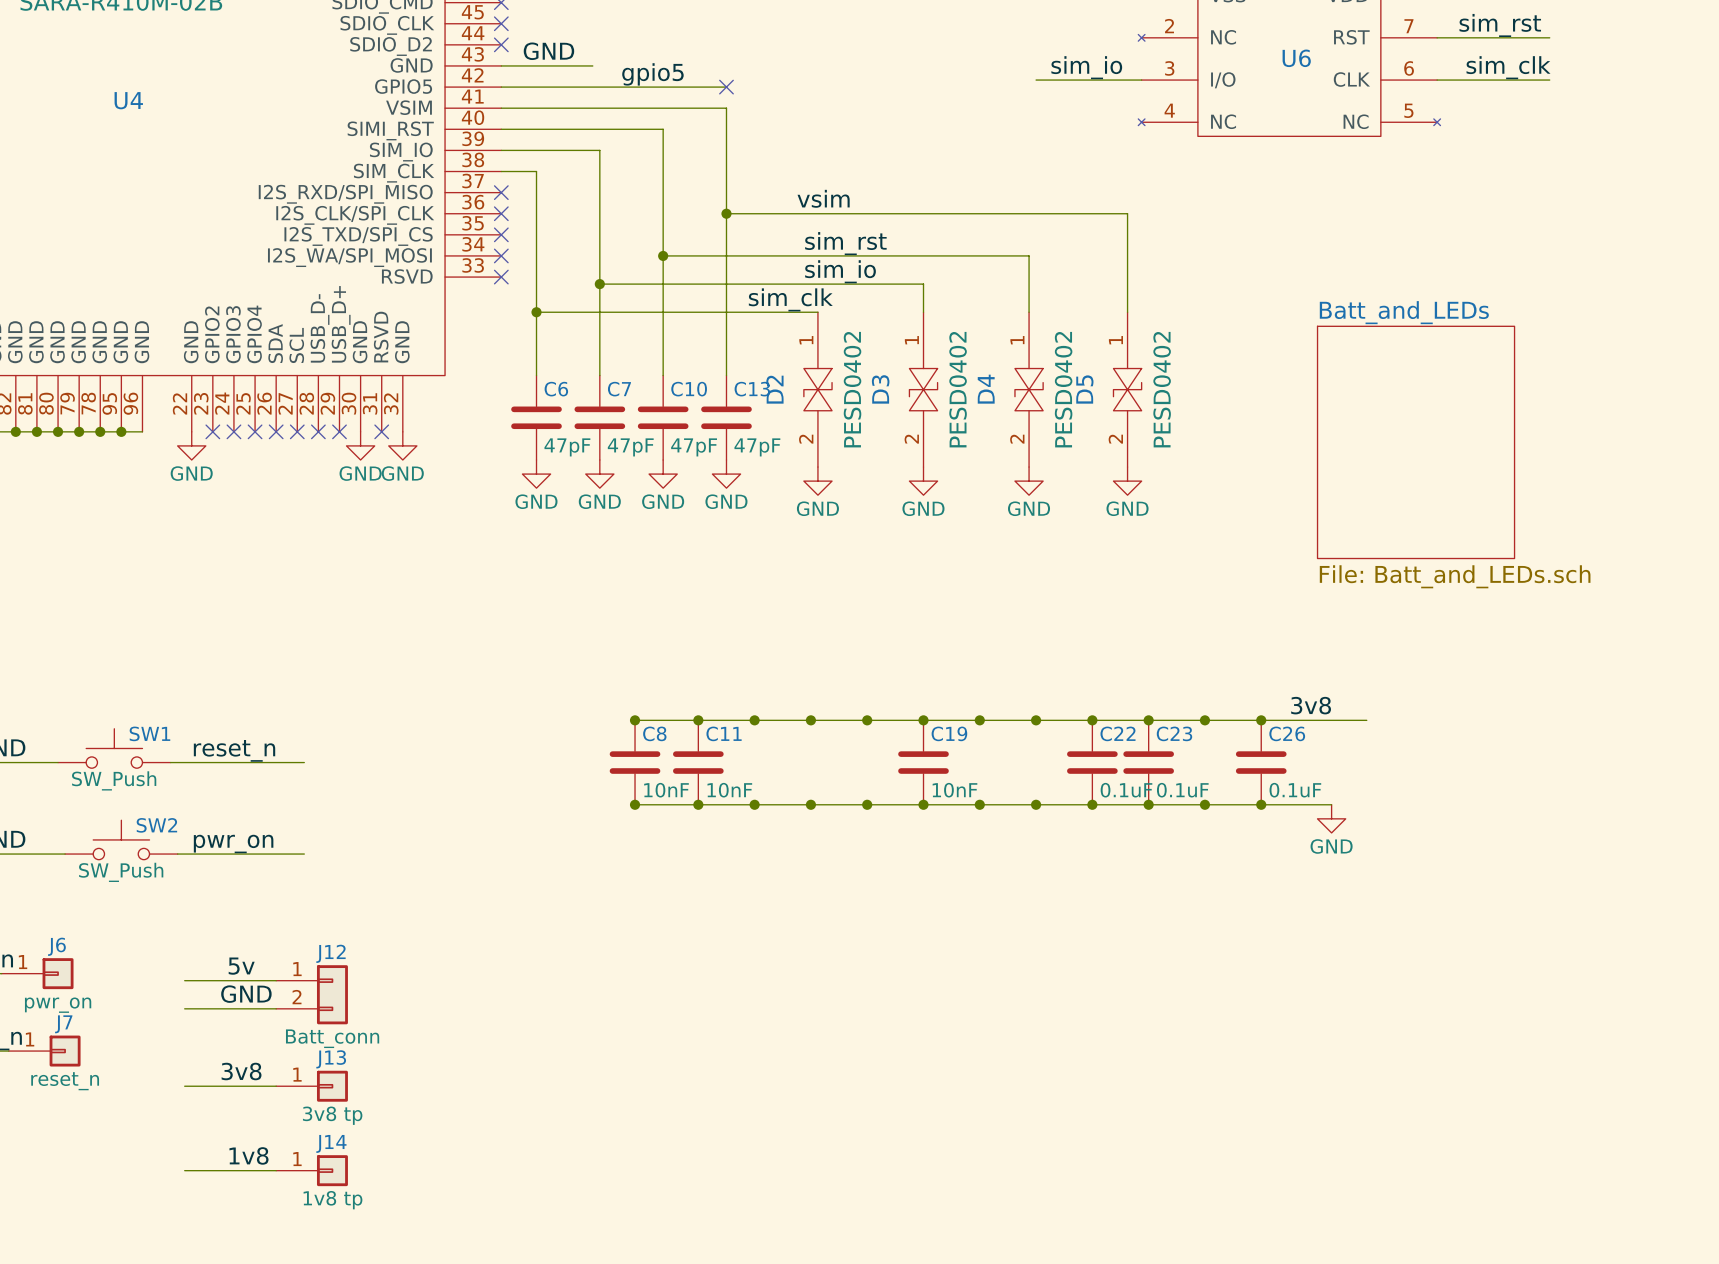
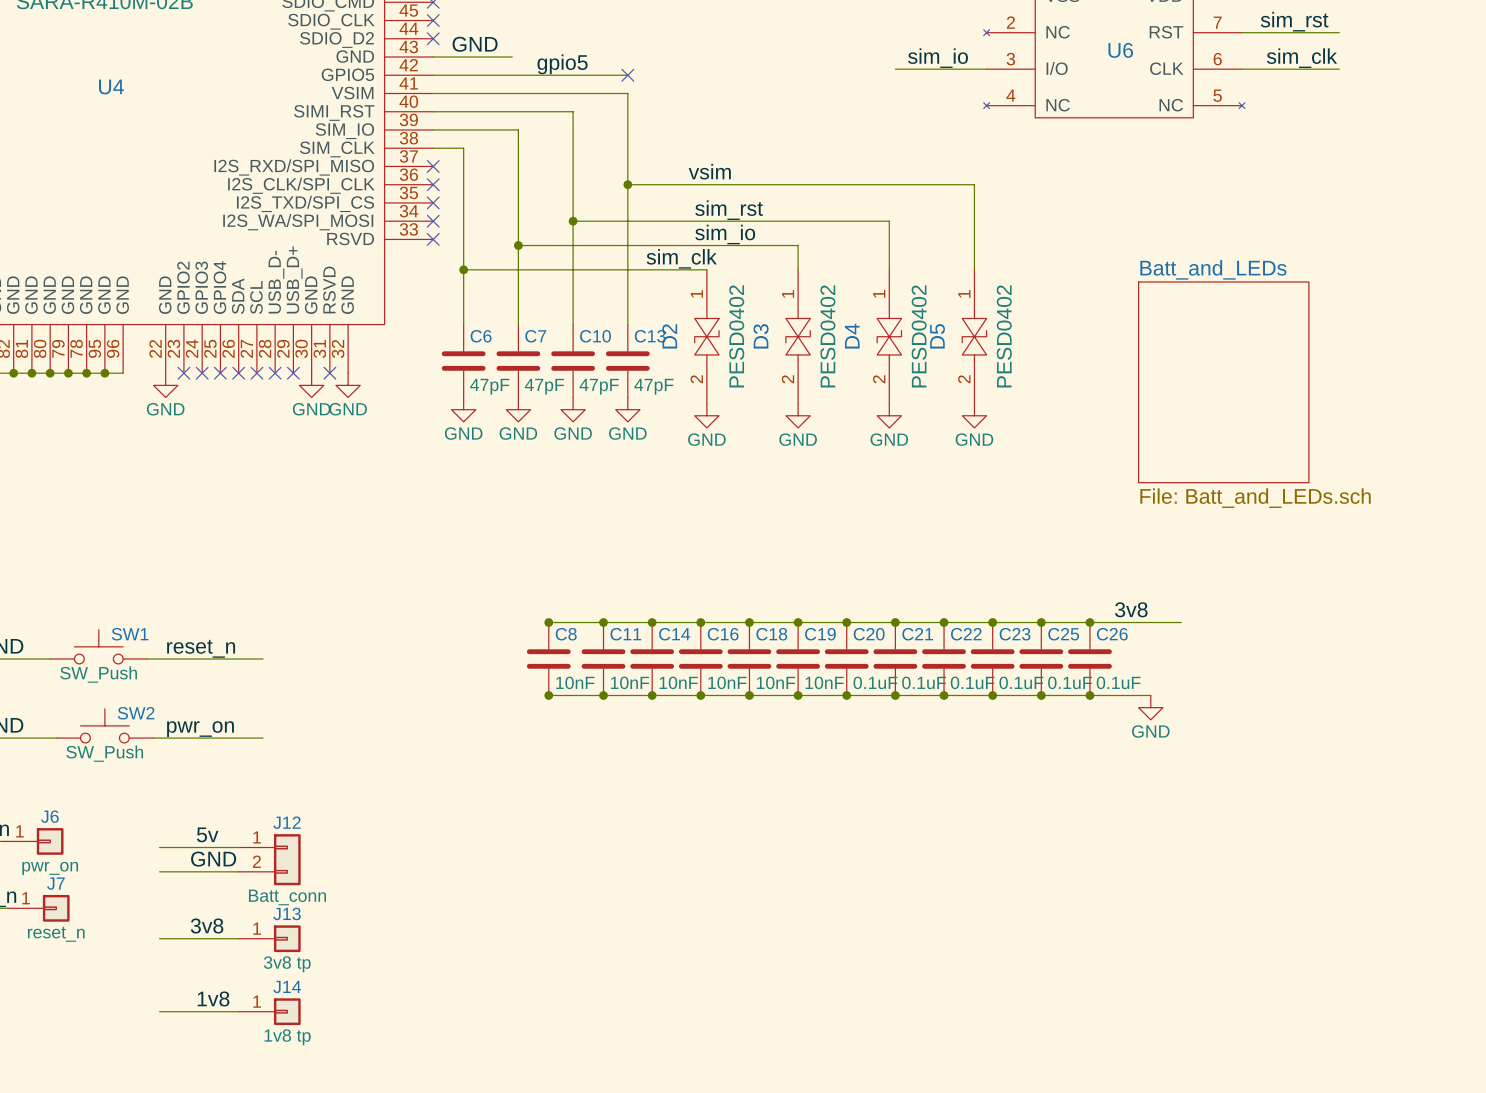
C14: none -> 10nF (652, 659)
C16: none -> 10nF (700, 659)
C18: none -> 10nF (749, 659)
C20: none -> 0.1uF (846, 659)
C21: none -> 0.1uF (895, 659)
C25: none -> 0.1uF (1041, 659)

